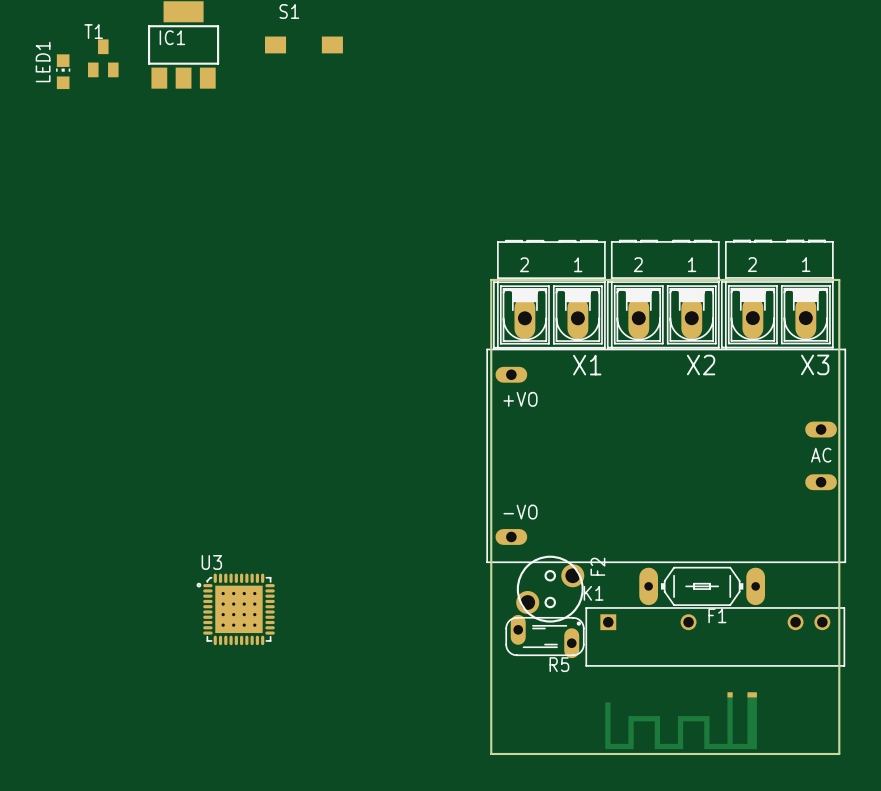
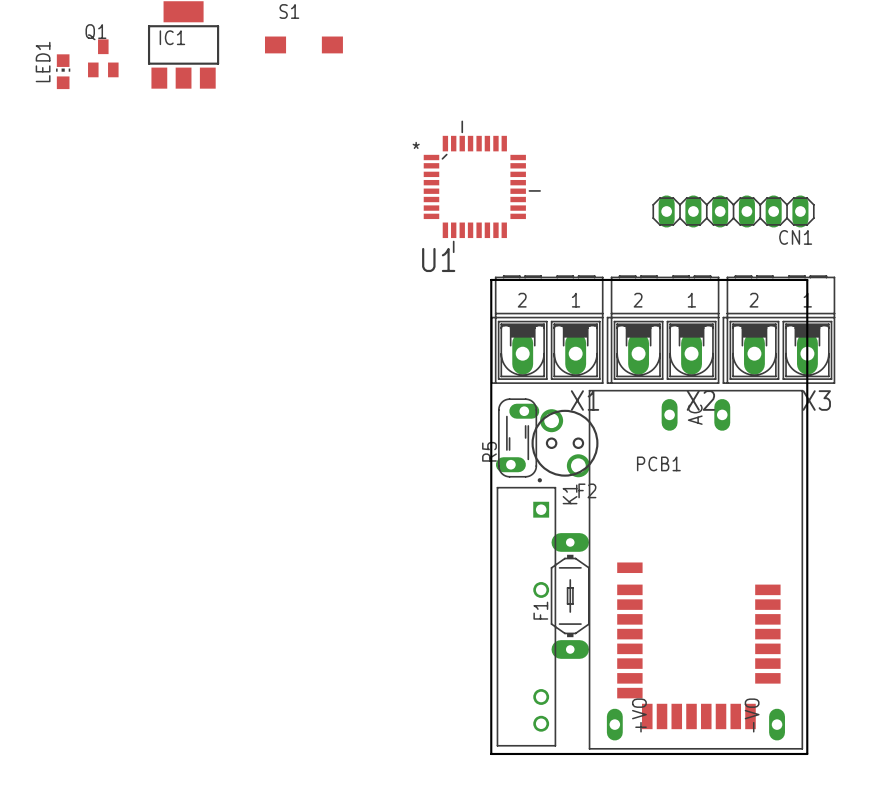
T1 name: T1 (93, 31) -> Q1 (95, 32)
U1: none -> (482, 186)
CN1: none -> (733, 211)
board edge: (807, 279) (839, 279) (839, 753) (807, 753) -> (807, 279) (807, 753)
X1 position: (549, 294) -> (547, 329)
X2 position: (663, 294) -> (663, 329)
X3 position: (777, 294) -> (778, 329)
part rotation: 0° (666, 455) -> 90° counterclockwise (695, 569)
F1 rotation: 0° (702, 586) -> 90° clockwise (570, 595)
F1 position: (702, 586) -> (570, 595)
F2 rotation: 0° (550, 589) -> 90° clockwise (564, 443)
F2 position: (550, 589) -> (564, 443)
U3: (235, 609) -> none
R5 rotation: 0° (544, 636) -> 90° clockwise (517, 437)
R5 position: (544, 636) -> (517, 437)
K1 rotation: 0° (710, 636) -> 90° clockwise (526, 612)
K1 position: (710, 636) -> (526, 612)
PCB1: none -> (698, 645)
part: (681, 720) -> none

